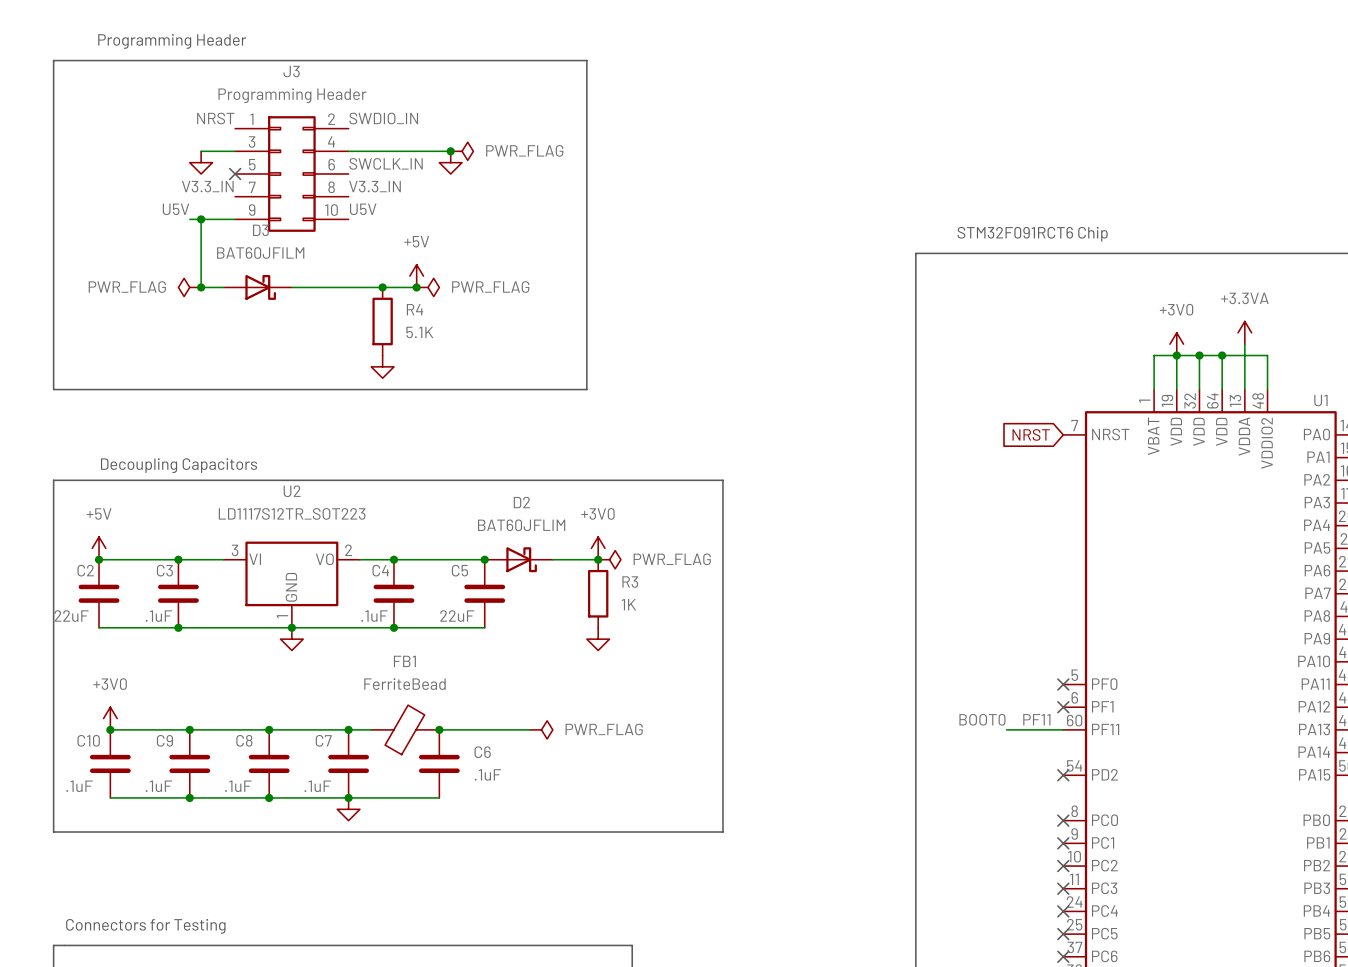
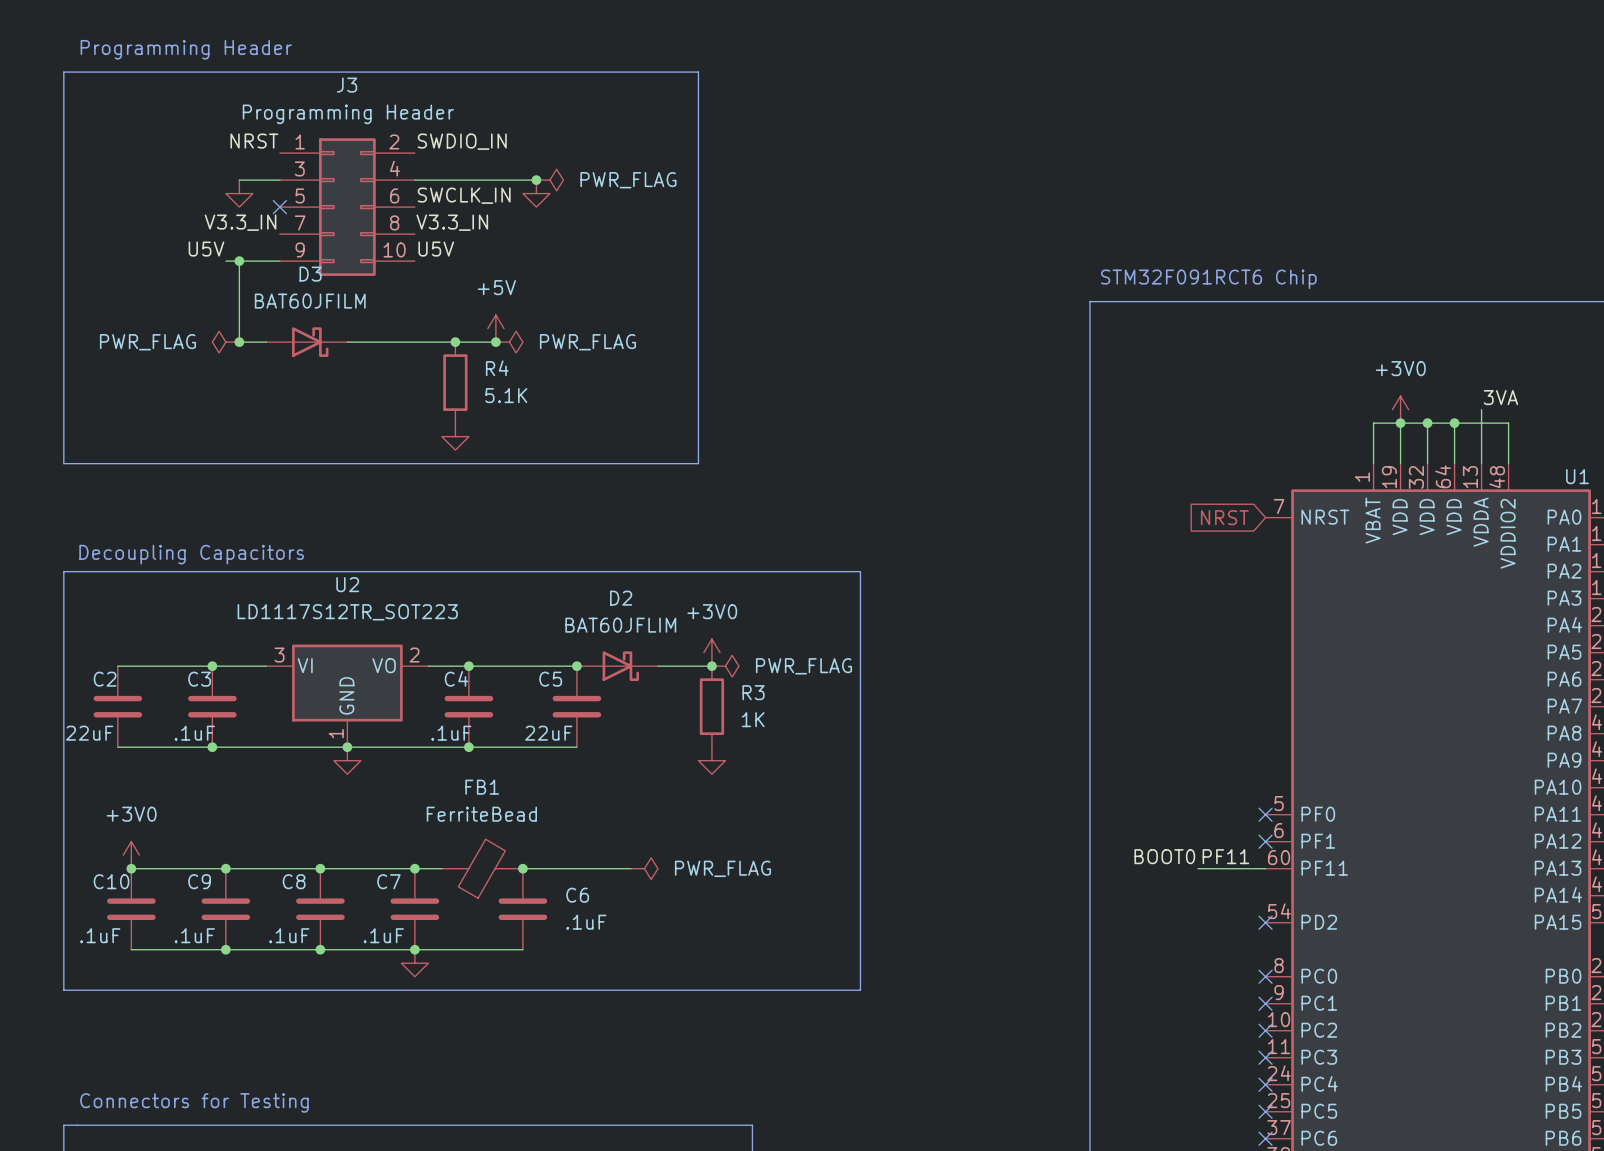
power symbol: +3.3VA (1244, 332) -> none
label: none -> 3VA (1500, 397)
power symbol: +5V (99, 548) -> none
junction: (99, 559) -> none

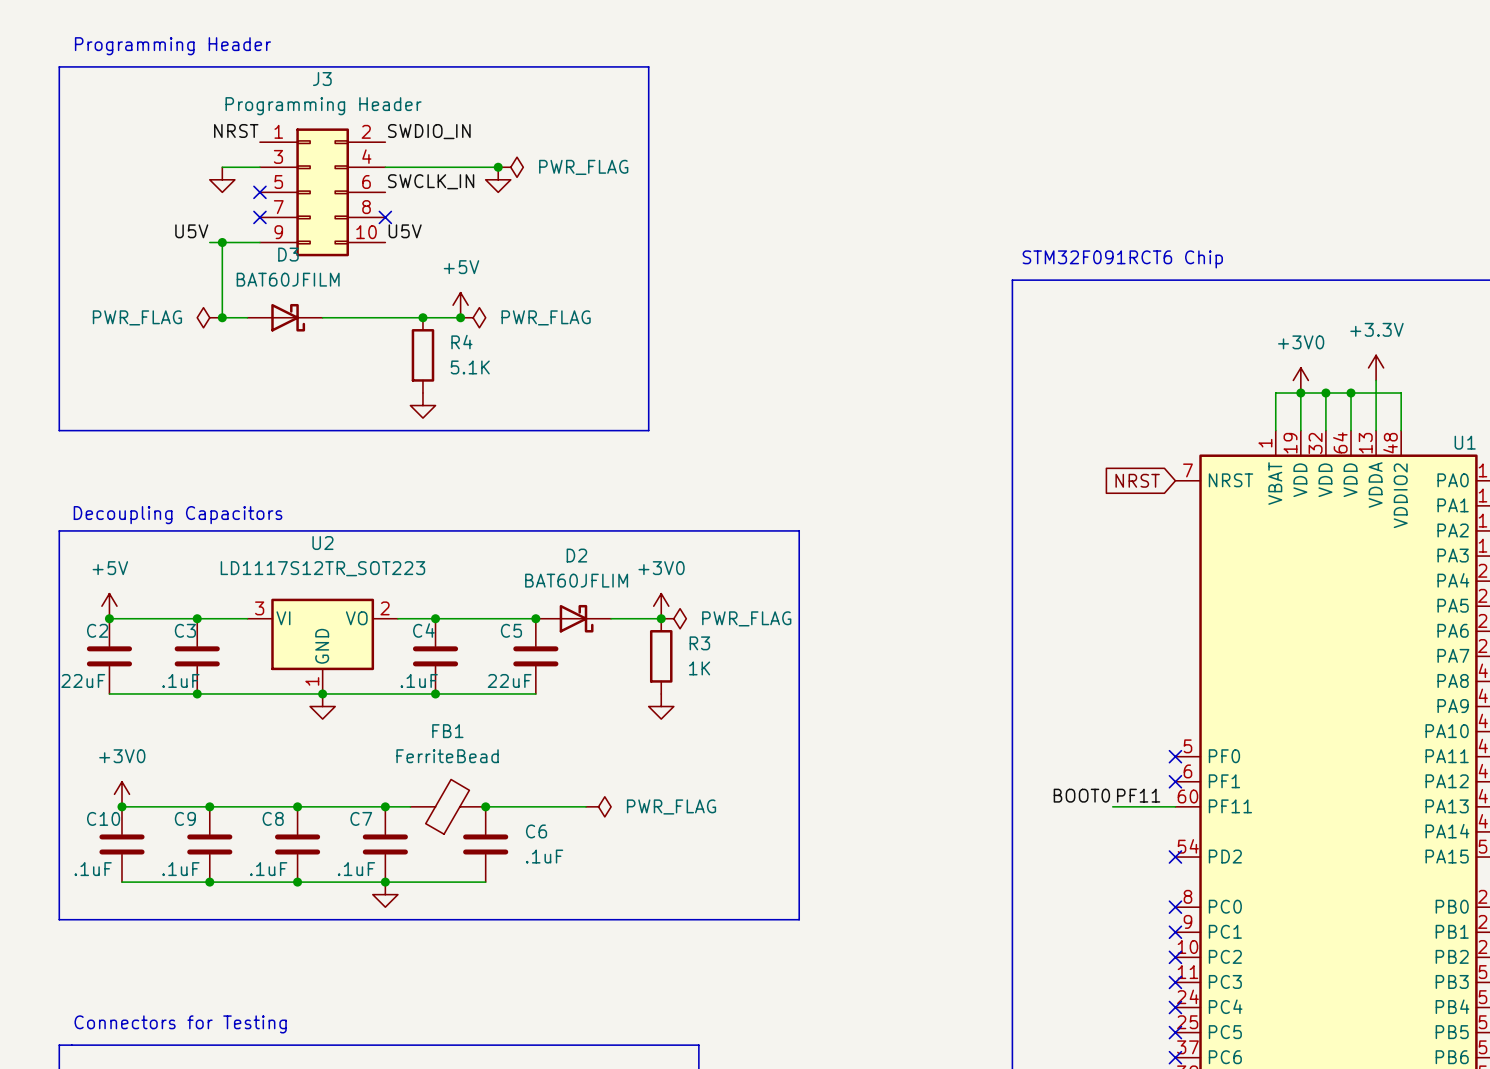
label: V3.3_IN (240, 222) -> none
label: V3.3_IN (452, 222) -> none
no-connect mark: none -> (259, 217)
no-connect mark: none -> (385, 217)
power symbol: none -> +3.3V (1376, 367)
label: 3VA (1500, 397) -> none
power symbol: none -> +5V (109, 606)
junction: none -> (109, 618)

